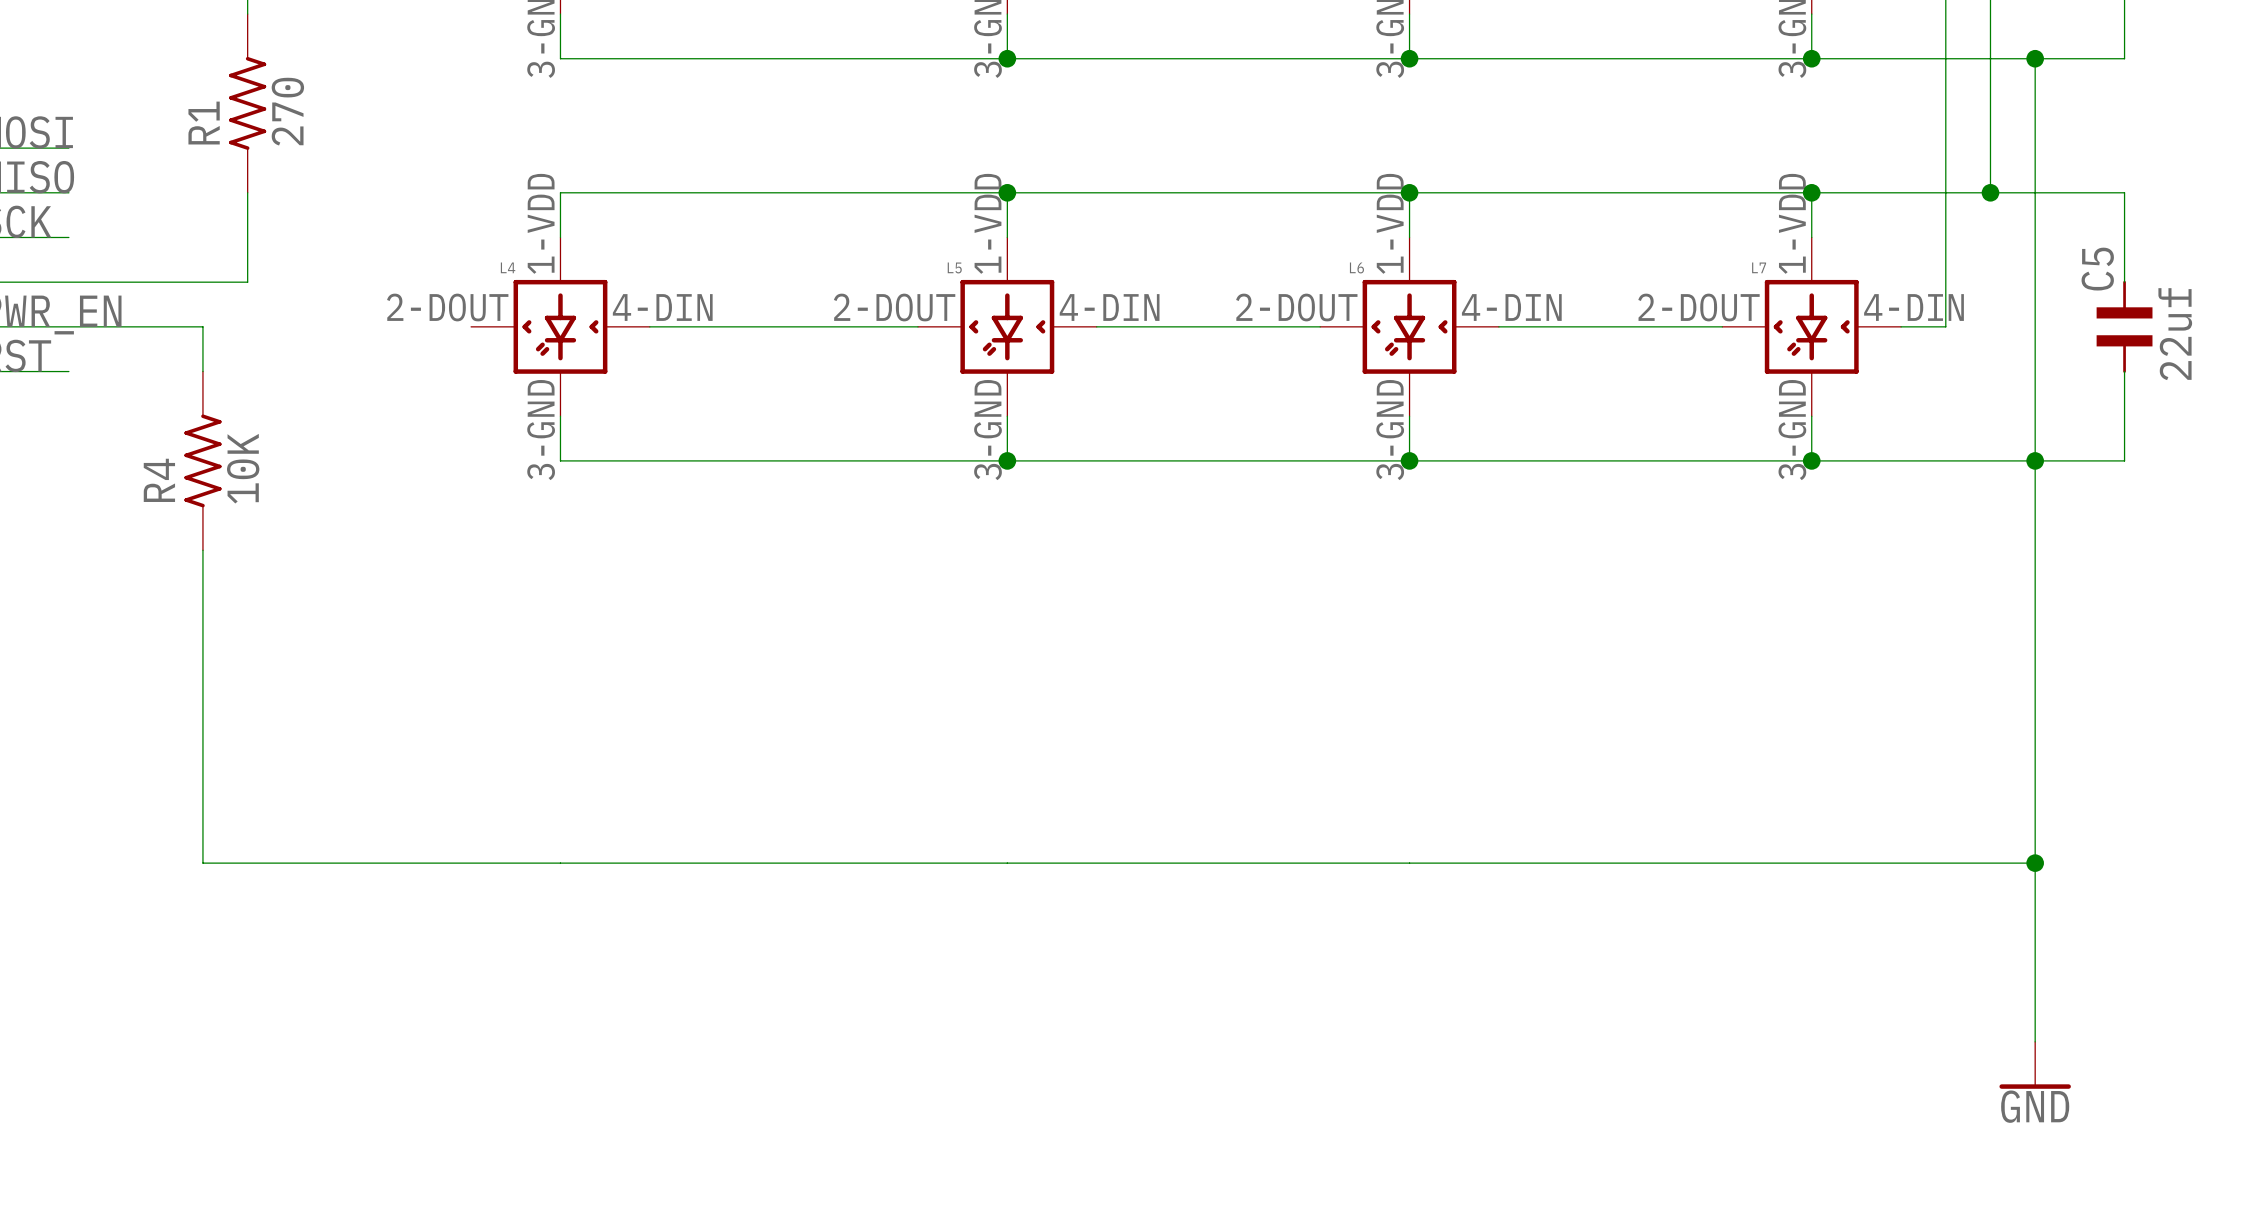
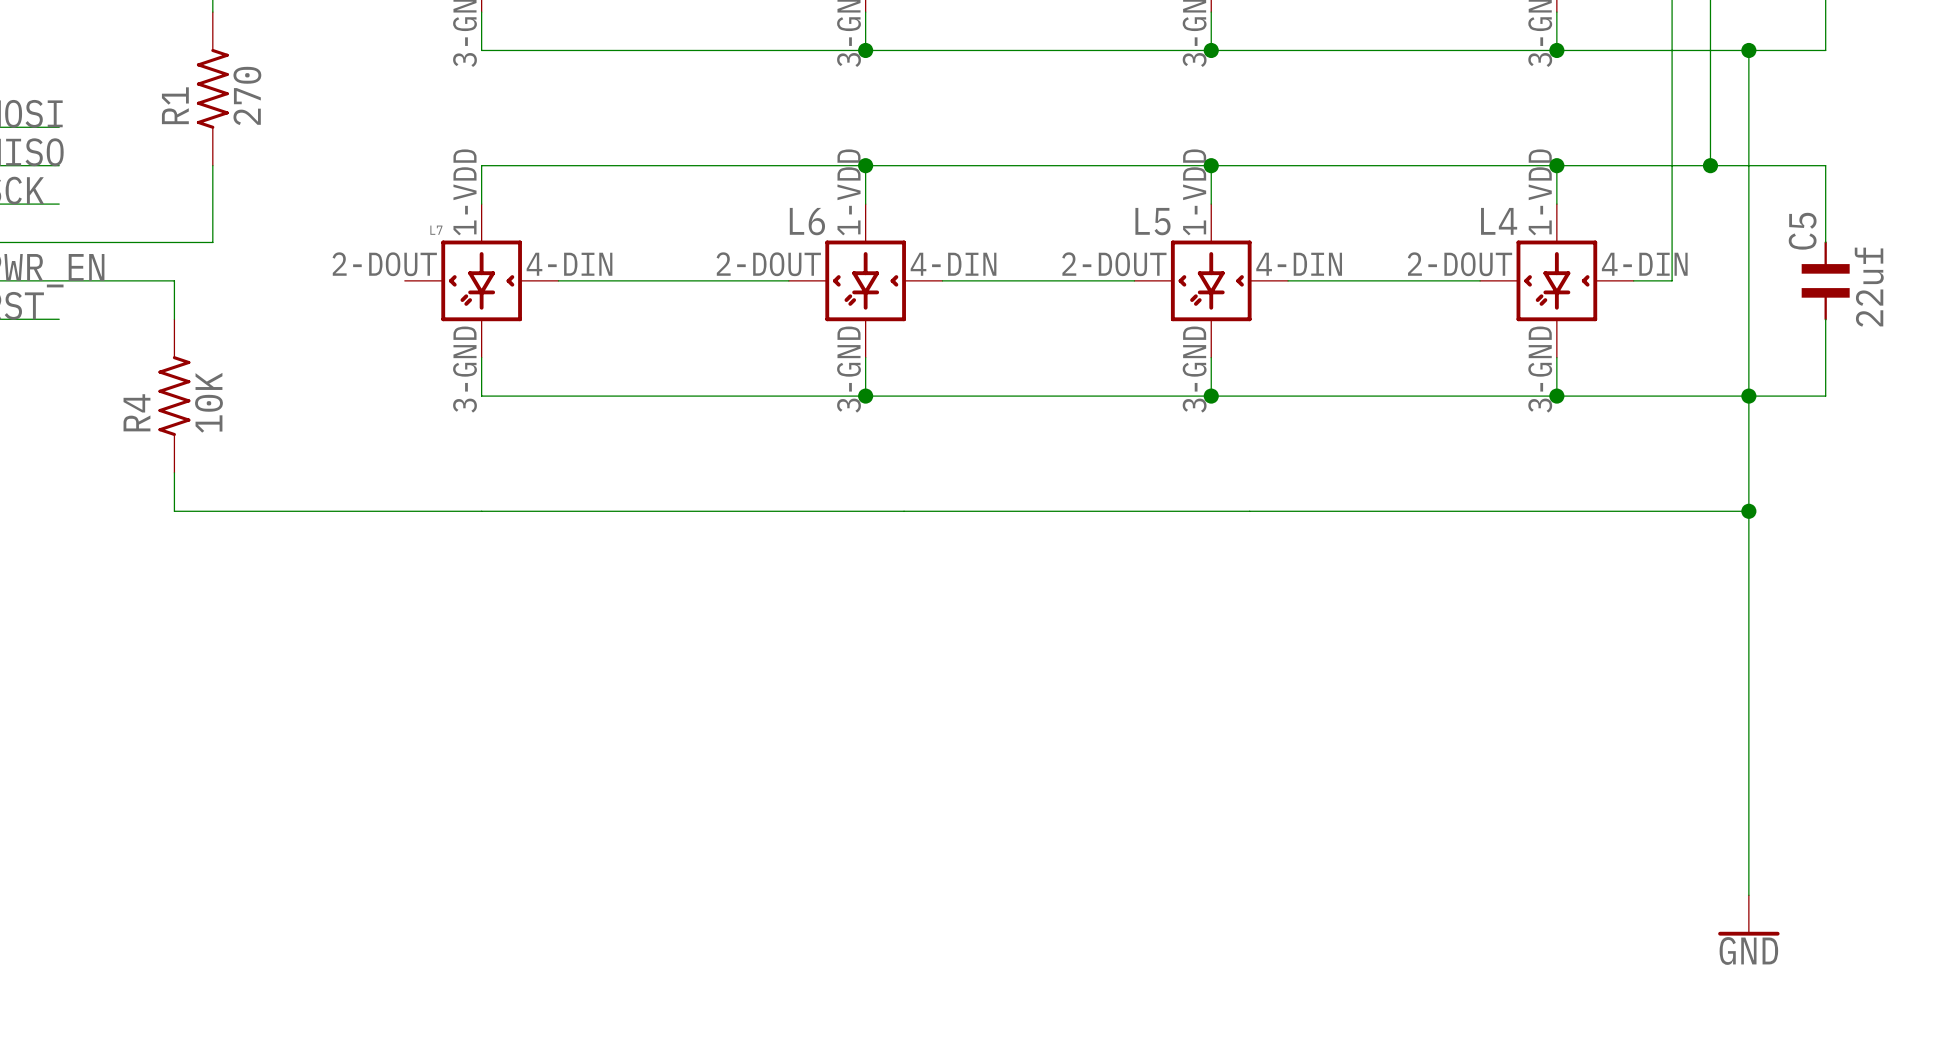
L4 name: L4 (508, 267) -> L7 (436, 230)
L5 name: L5 (954, 267) -> L6 (807, 221)
L6 name: L6 (1356, 267) -> L5 (1152, 221)
L7 name: L7 (1759, 267) -> L4 (1499, 221)
wire: (202, 594) (202, 863) (2035, 863) -> (174, 511) (1748, 511)
junction: none -> (1748, 511)
junction: (2035, 863) -> none

